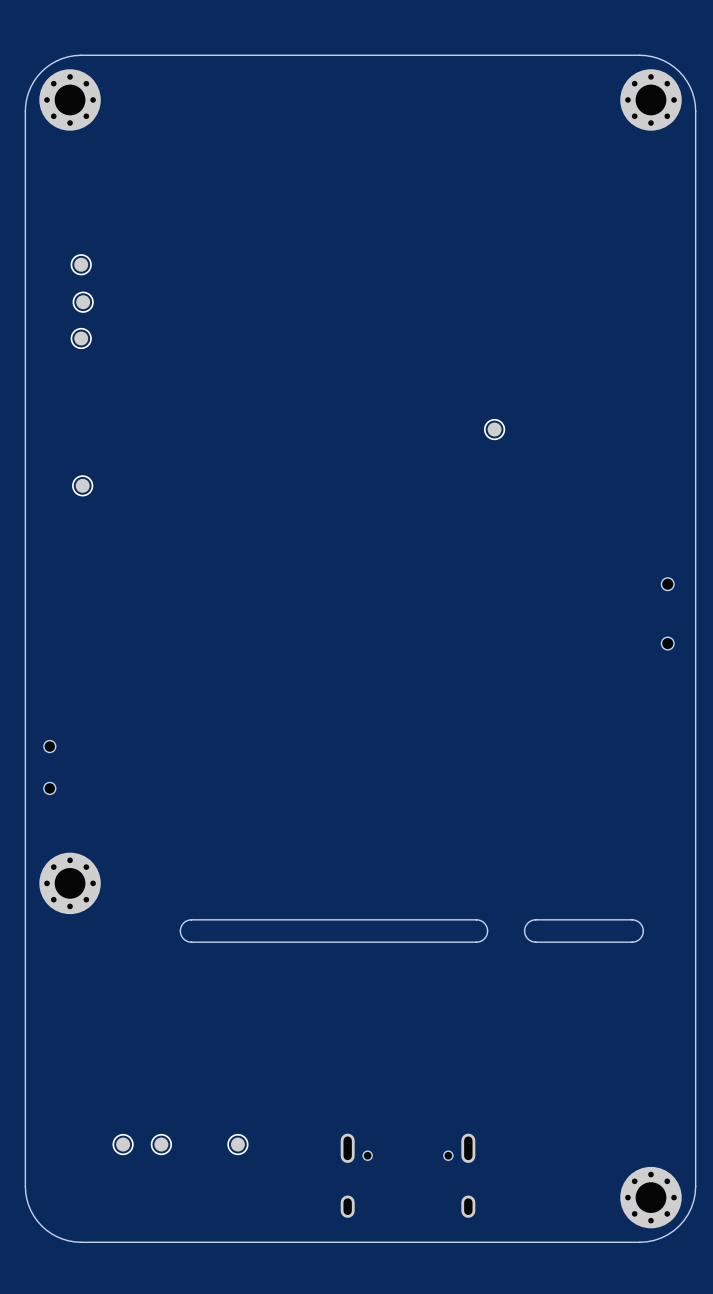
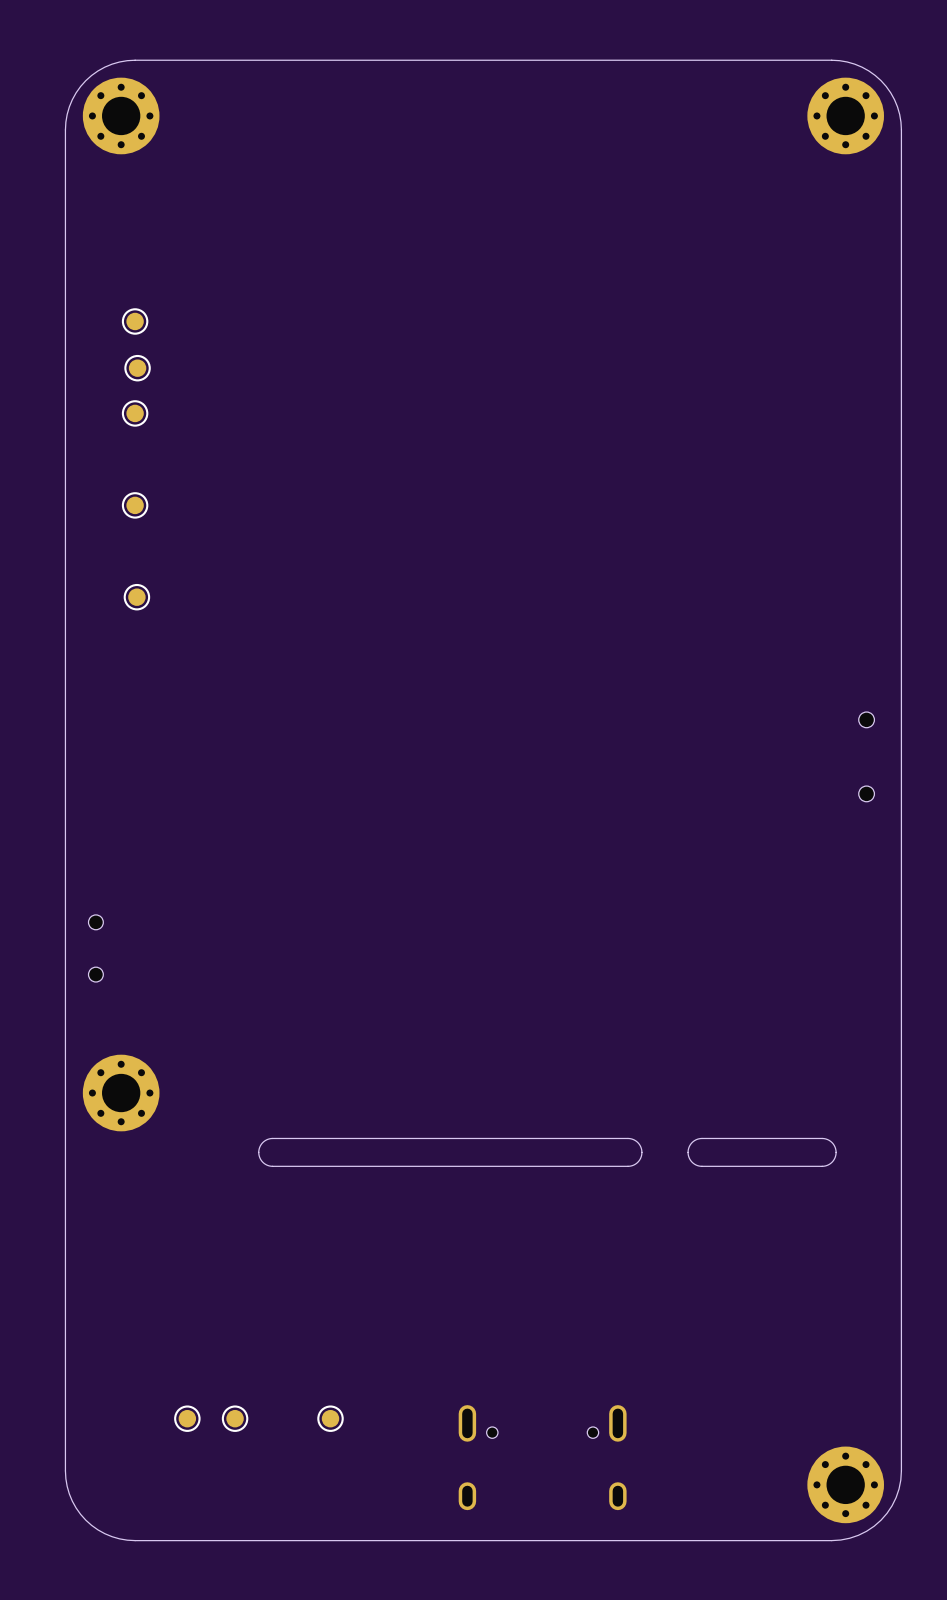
part: none -> (135, 505)
part: (494, 429) -> none

